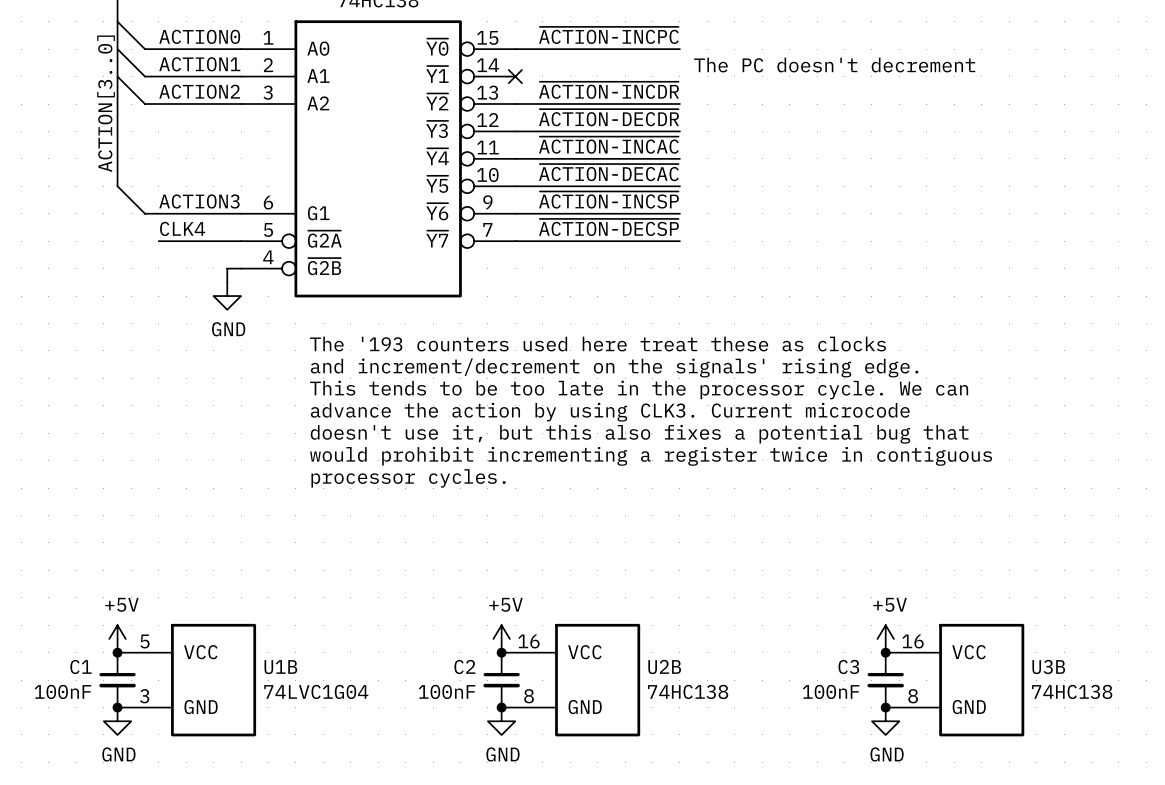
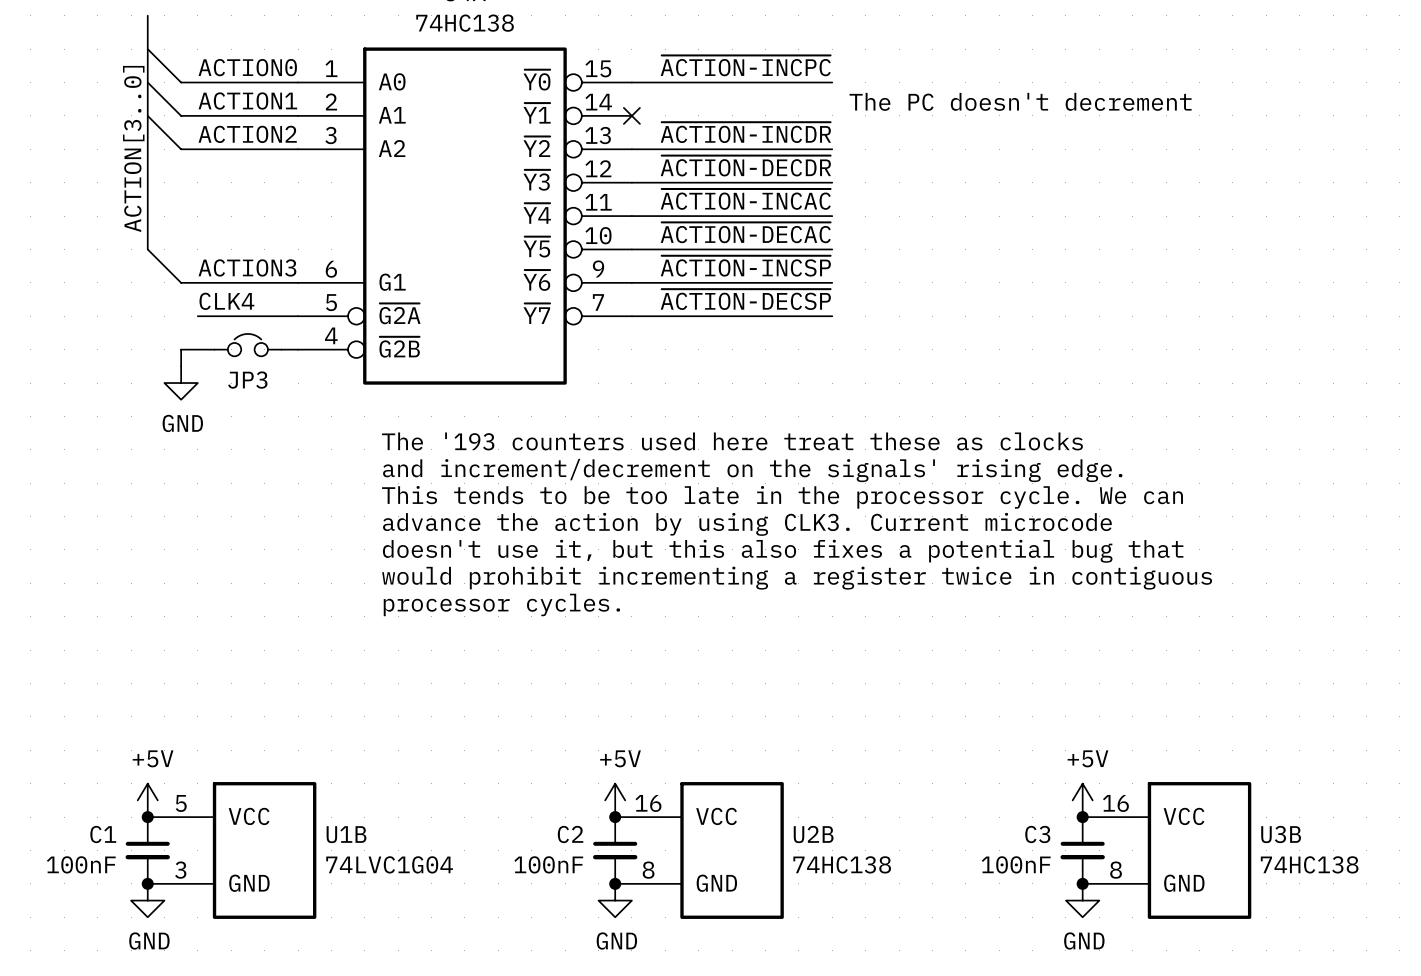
JP3: none -> (247, 345)
wire: none -> (214, 349) (181, 349) (181, 366)
wire: (227, 268) (227, 282) -> none
power symbol position: GND (227, 296) -> GND (181, 383)

